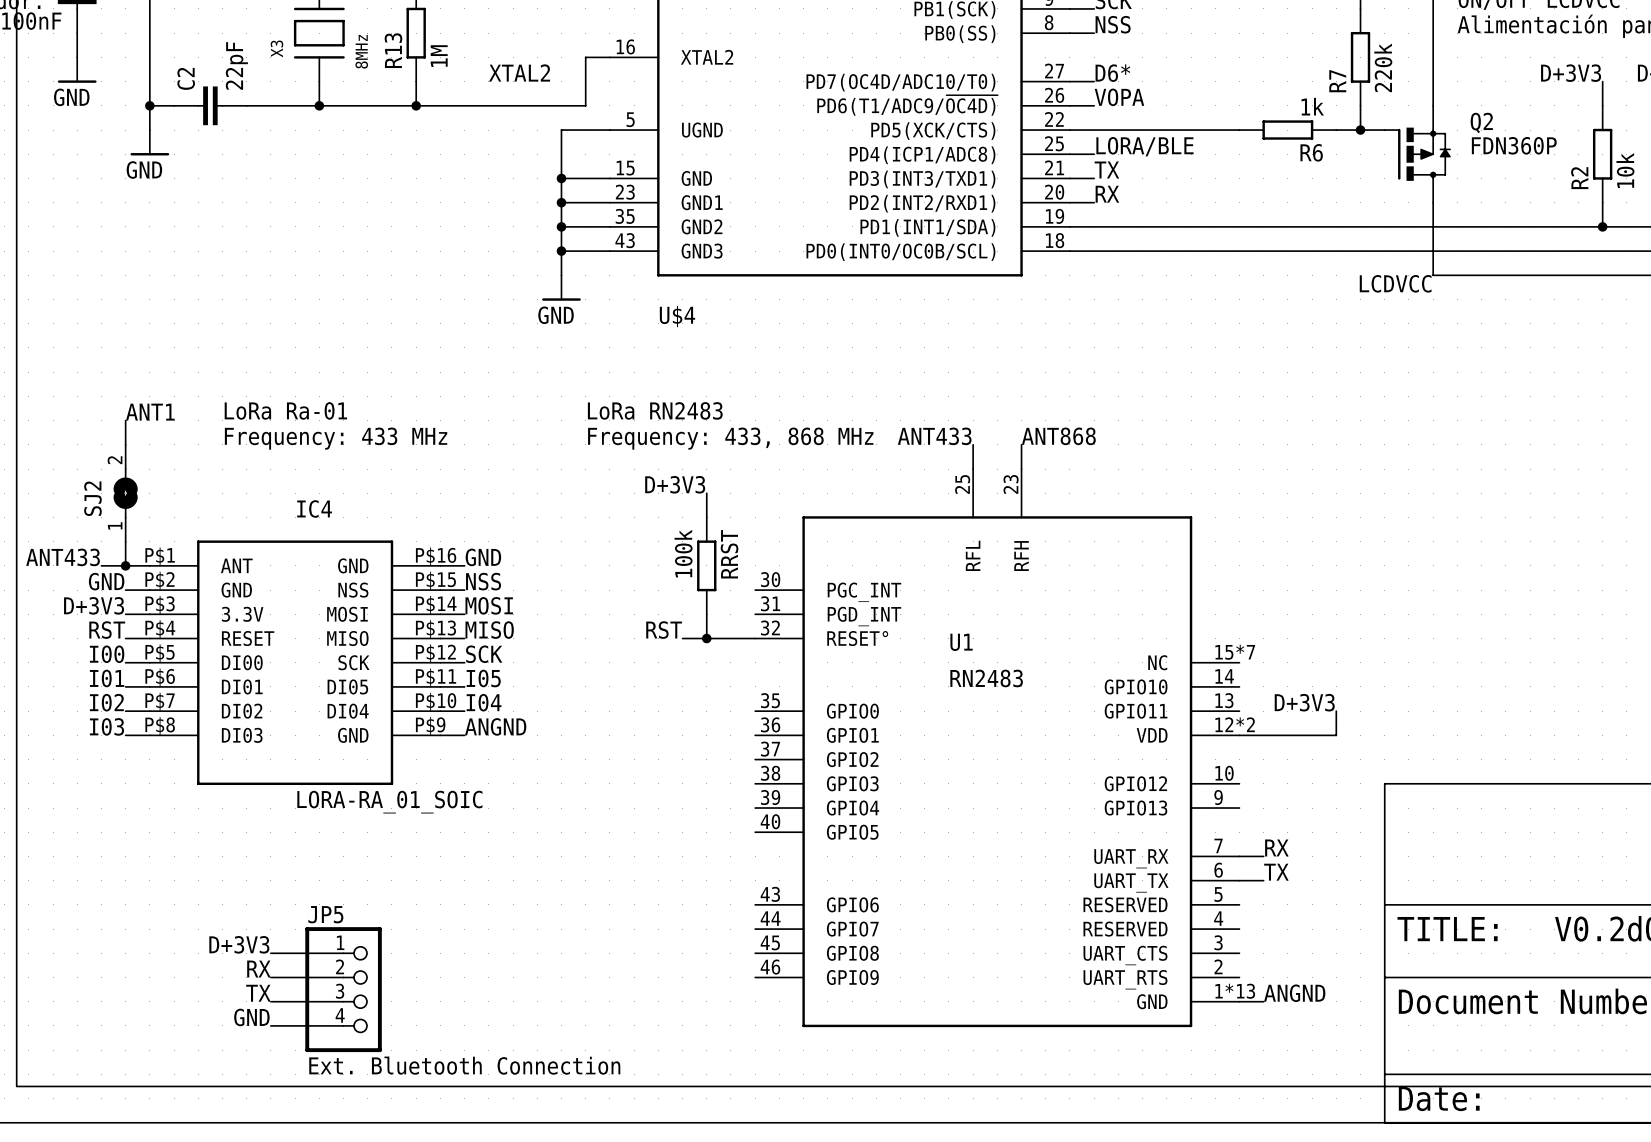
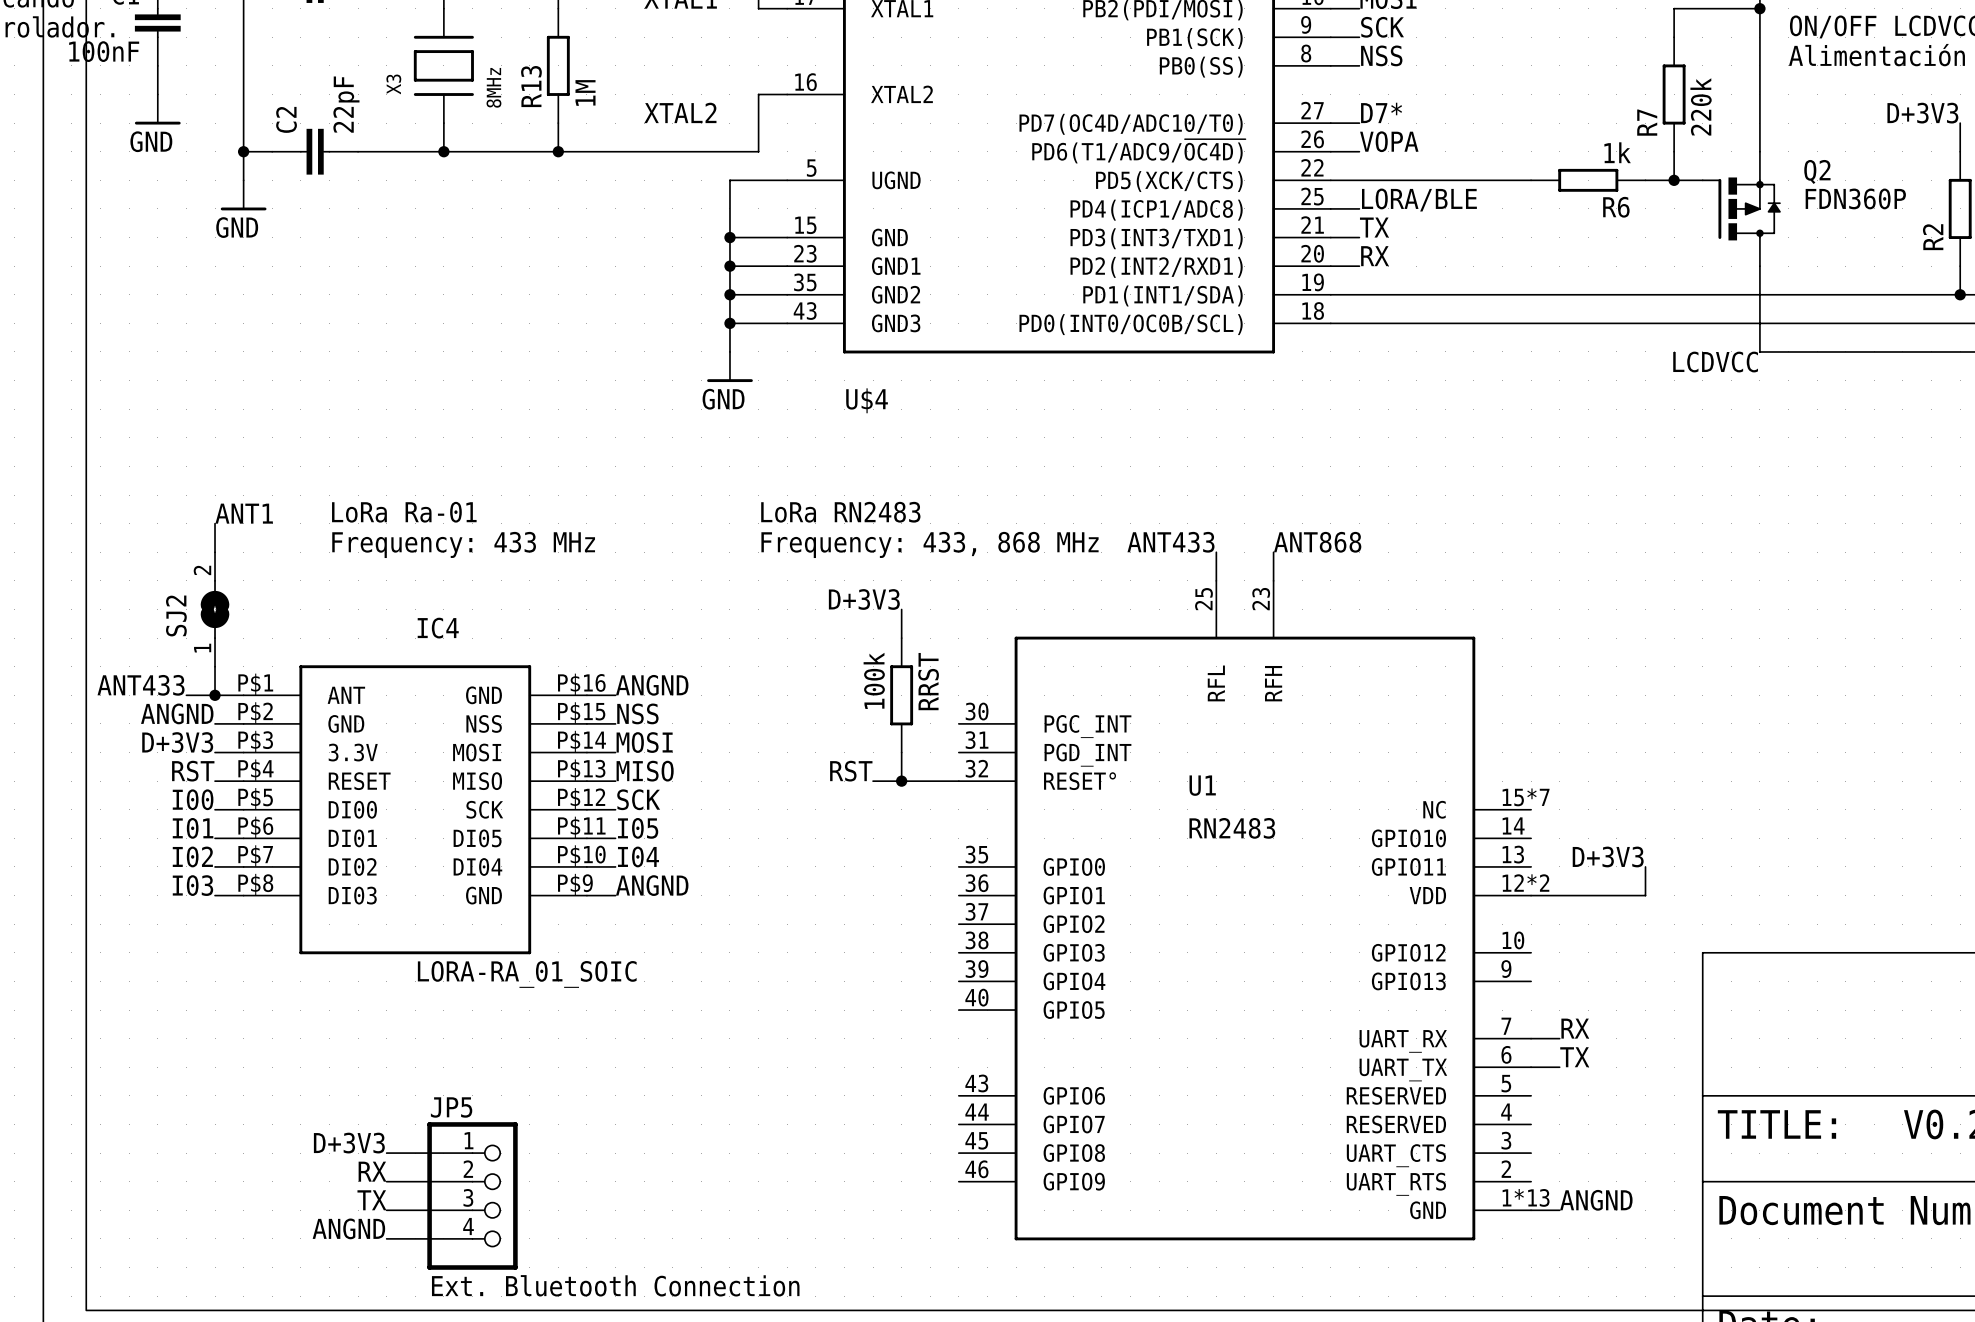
label: D6* (1112, 73) -> D7* (1381, 112)
label: GND (483, 557) -> ANGND (652, 685)
label: GND (106, 581) -> ANGND (177, 713)
label: GND (251, 1017) -> ANGND (348, 1228)

